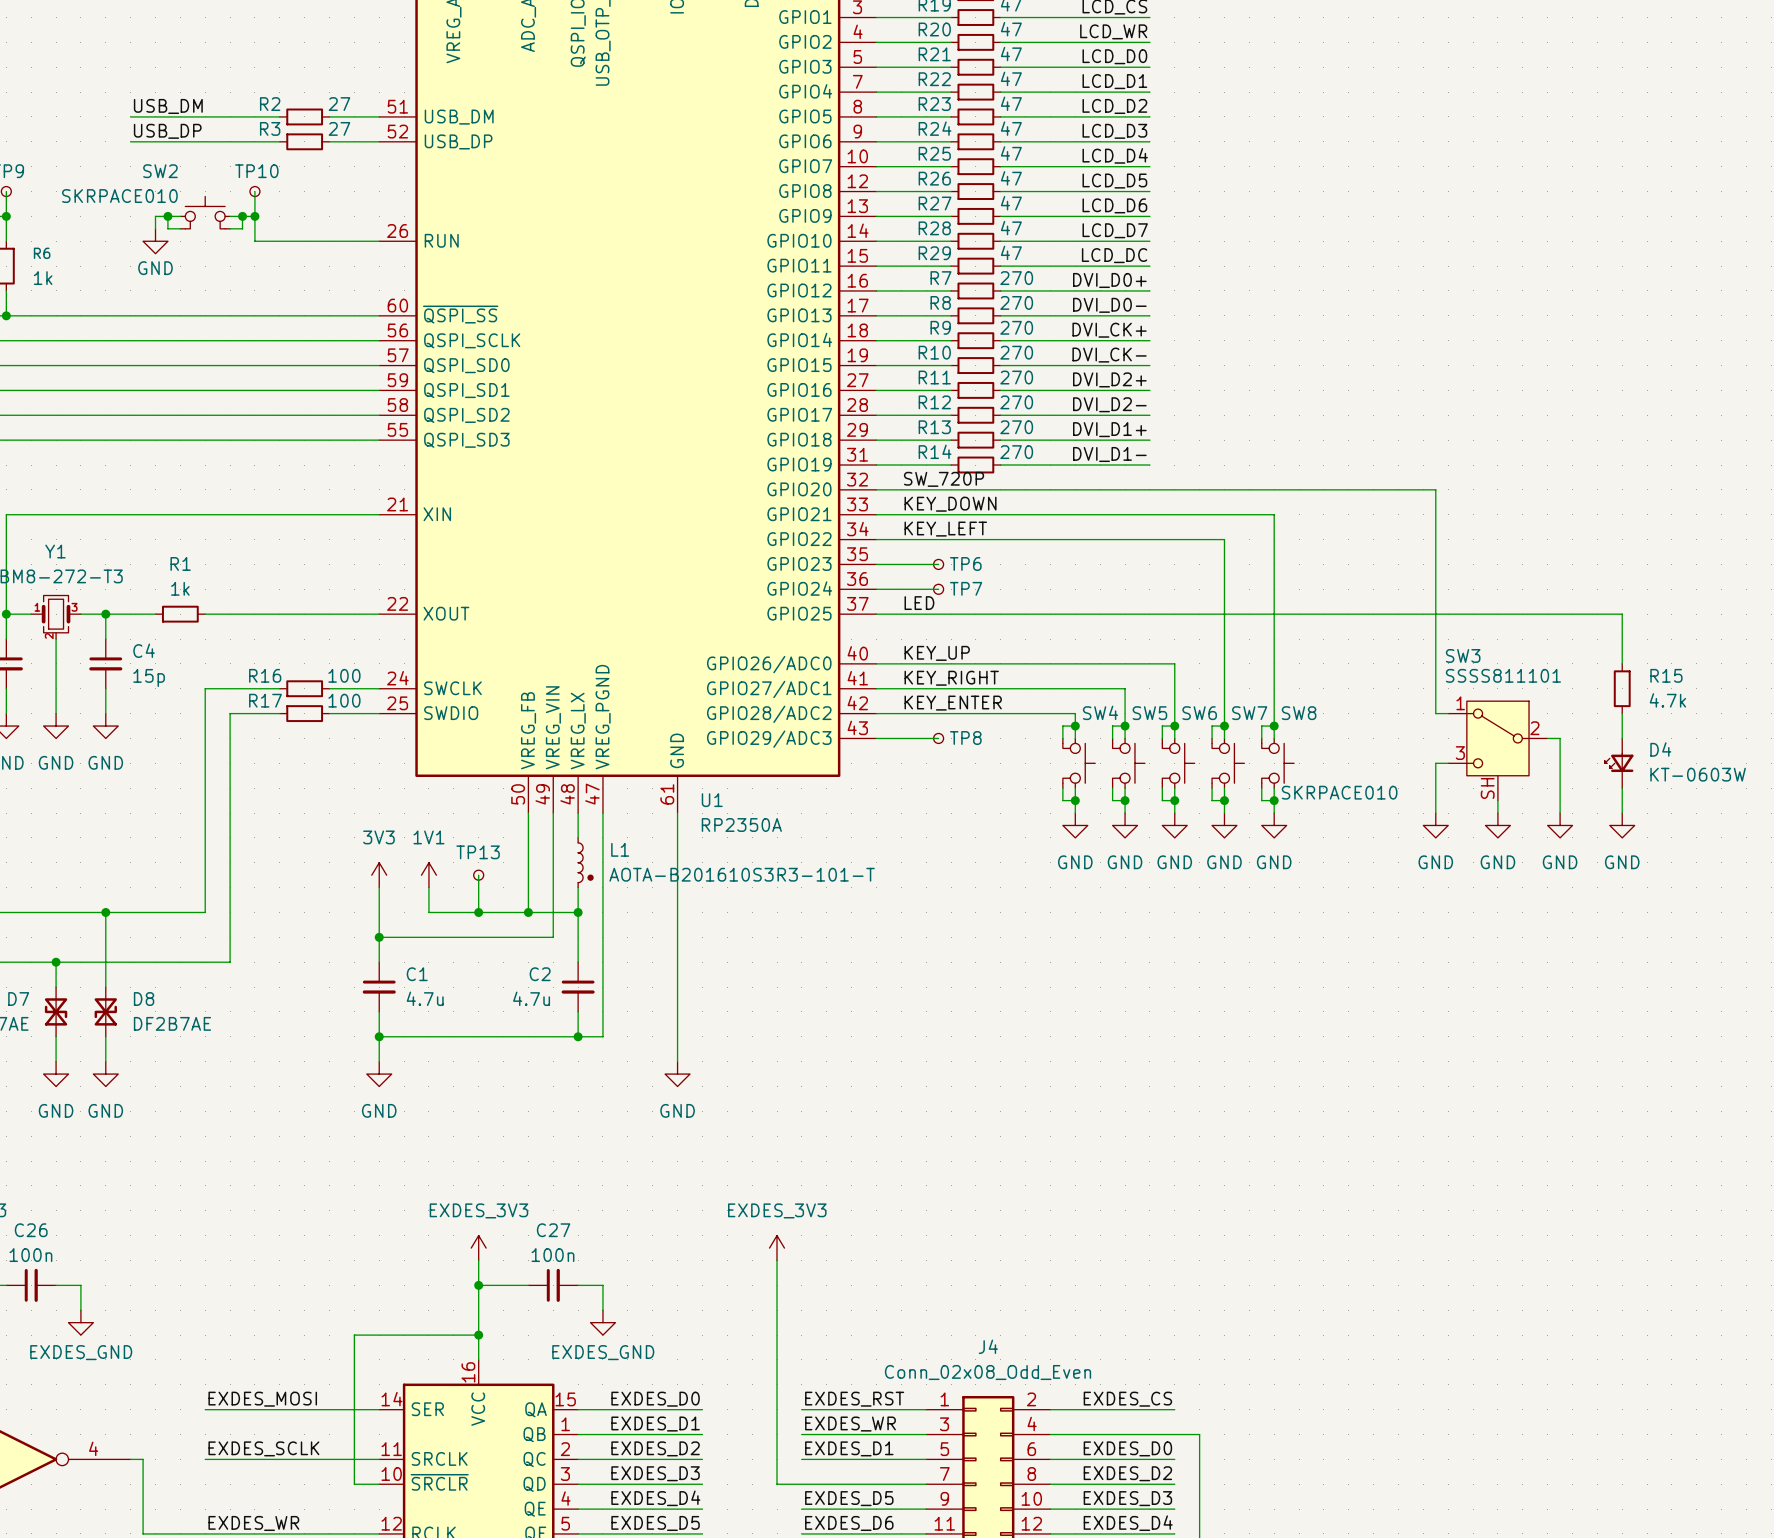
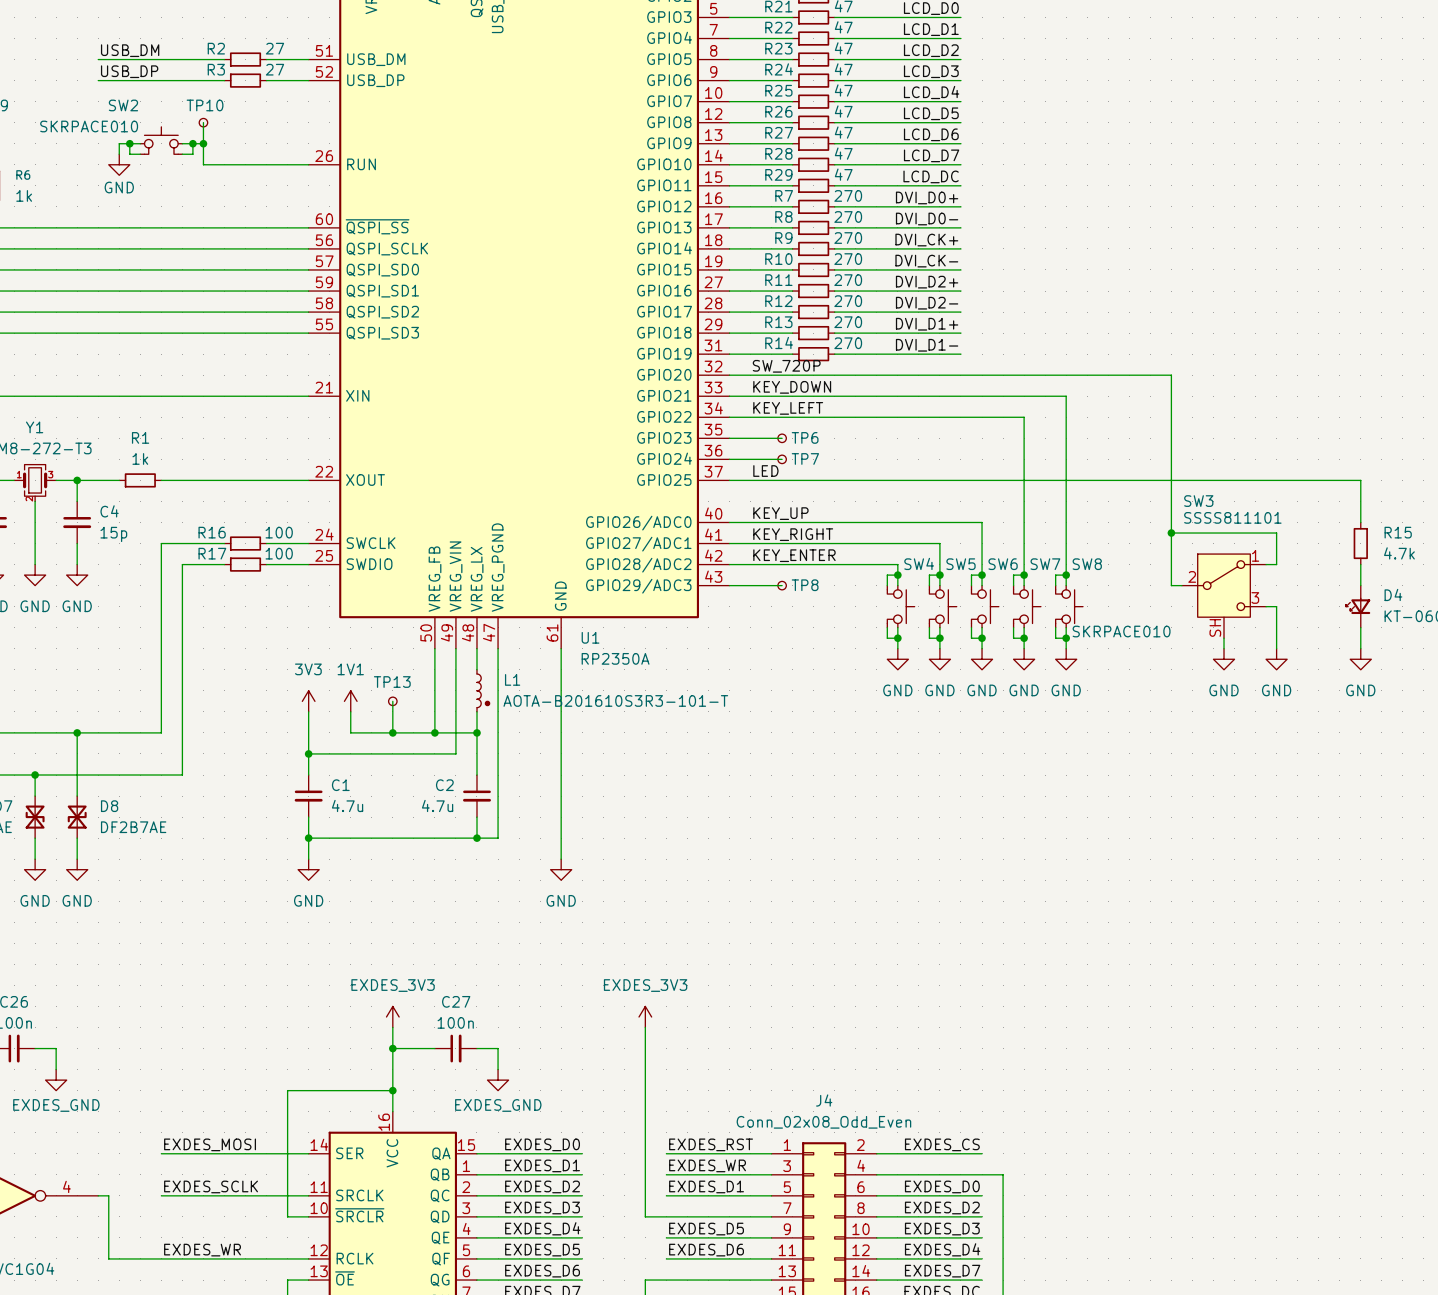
wire: (1398, 489) (1435, 489) (1435, 713) (1448, 713) -> (1171, 375) (1171, 585) (1181, 585)
wire: none -> (1171, 533) (1276, 533) (1276, 564) (1266, 564)
junction: none -> (1171, 533)
SW3 flip: as is (1497, 738) -> left-right (1224, 585)
wire: (1547, 738) (1560, 738) (1560, 813) -> none
wire: (1448, 763) (1435, 763) (1435, 813) -> none
wire: none -> (1266, 606) (1276, 606) (1276, 648)
wire: (1497, 800) (1497, 813) -> (1224, 638) (1224, 648)
power symbol: GND (1435, 825) -> none
power symbol: none -> GND (1224, 659)
power symbol: GND (1497, 825) -> none
power symbol: none -> GND (1276, 659)
power symbol: GND (1560, 825) -> none

